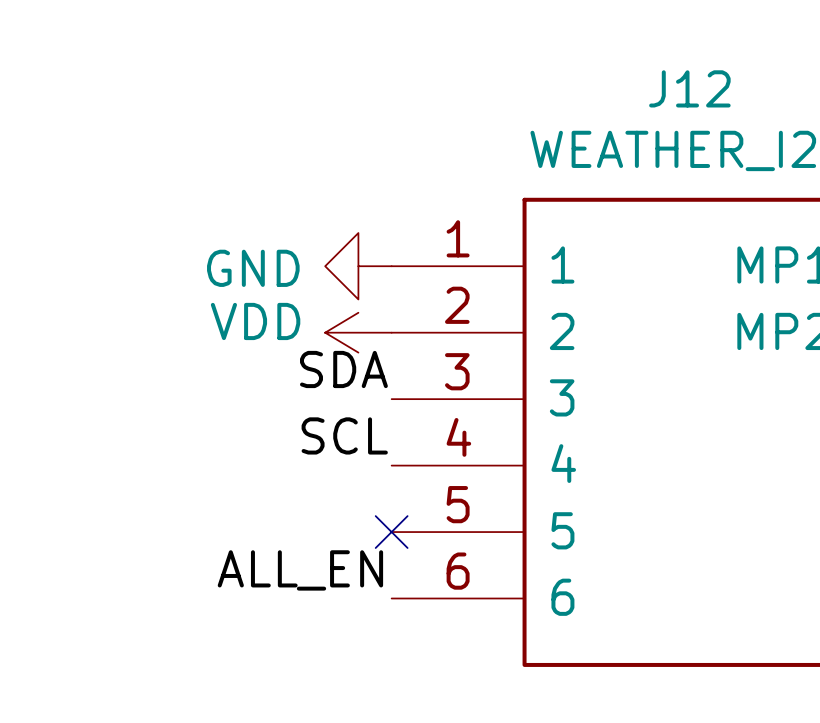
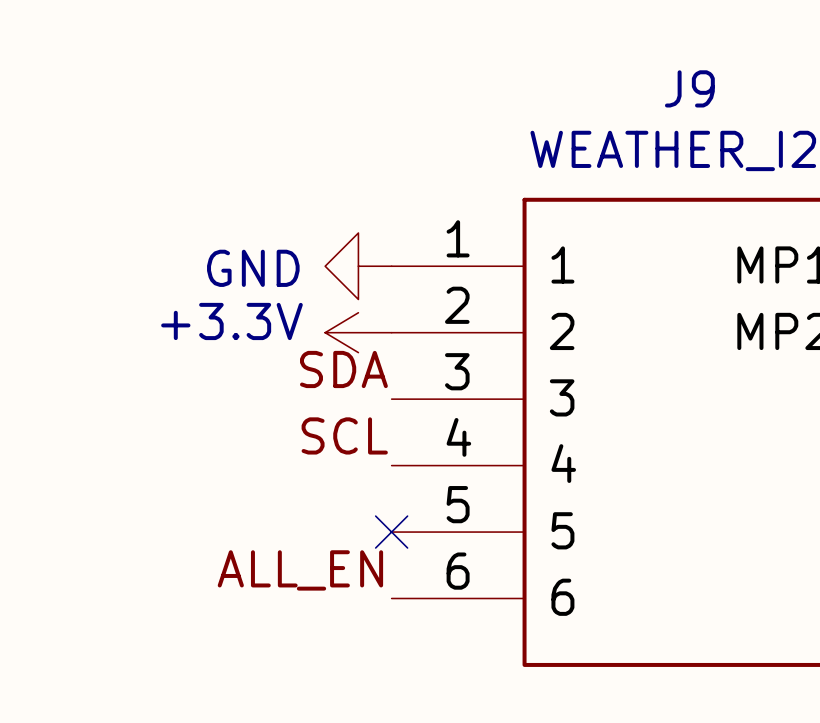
J12 name: J12 (689, 88) -> J9 (689, 88)
power symbol: VDD (358, 332) -> +3.3V (358, 332)

